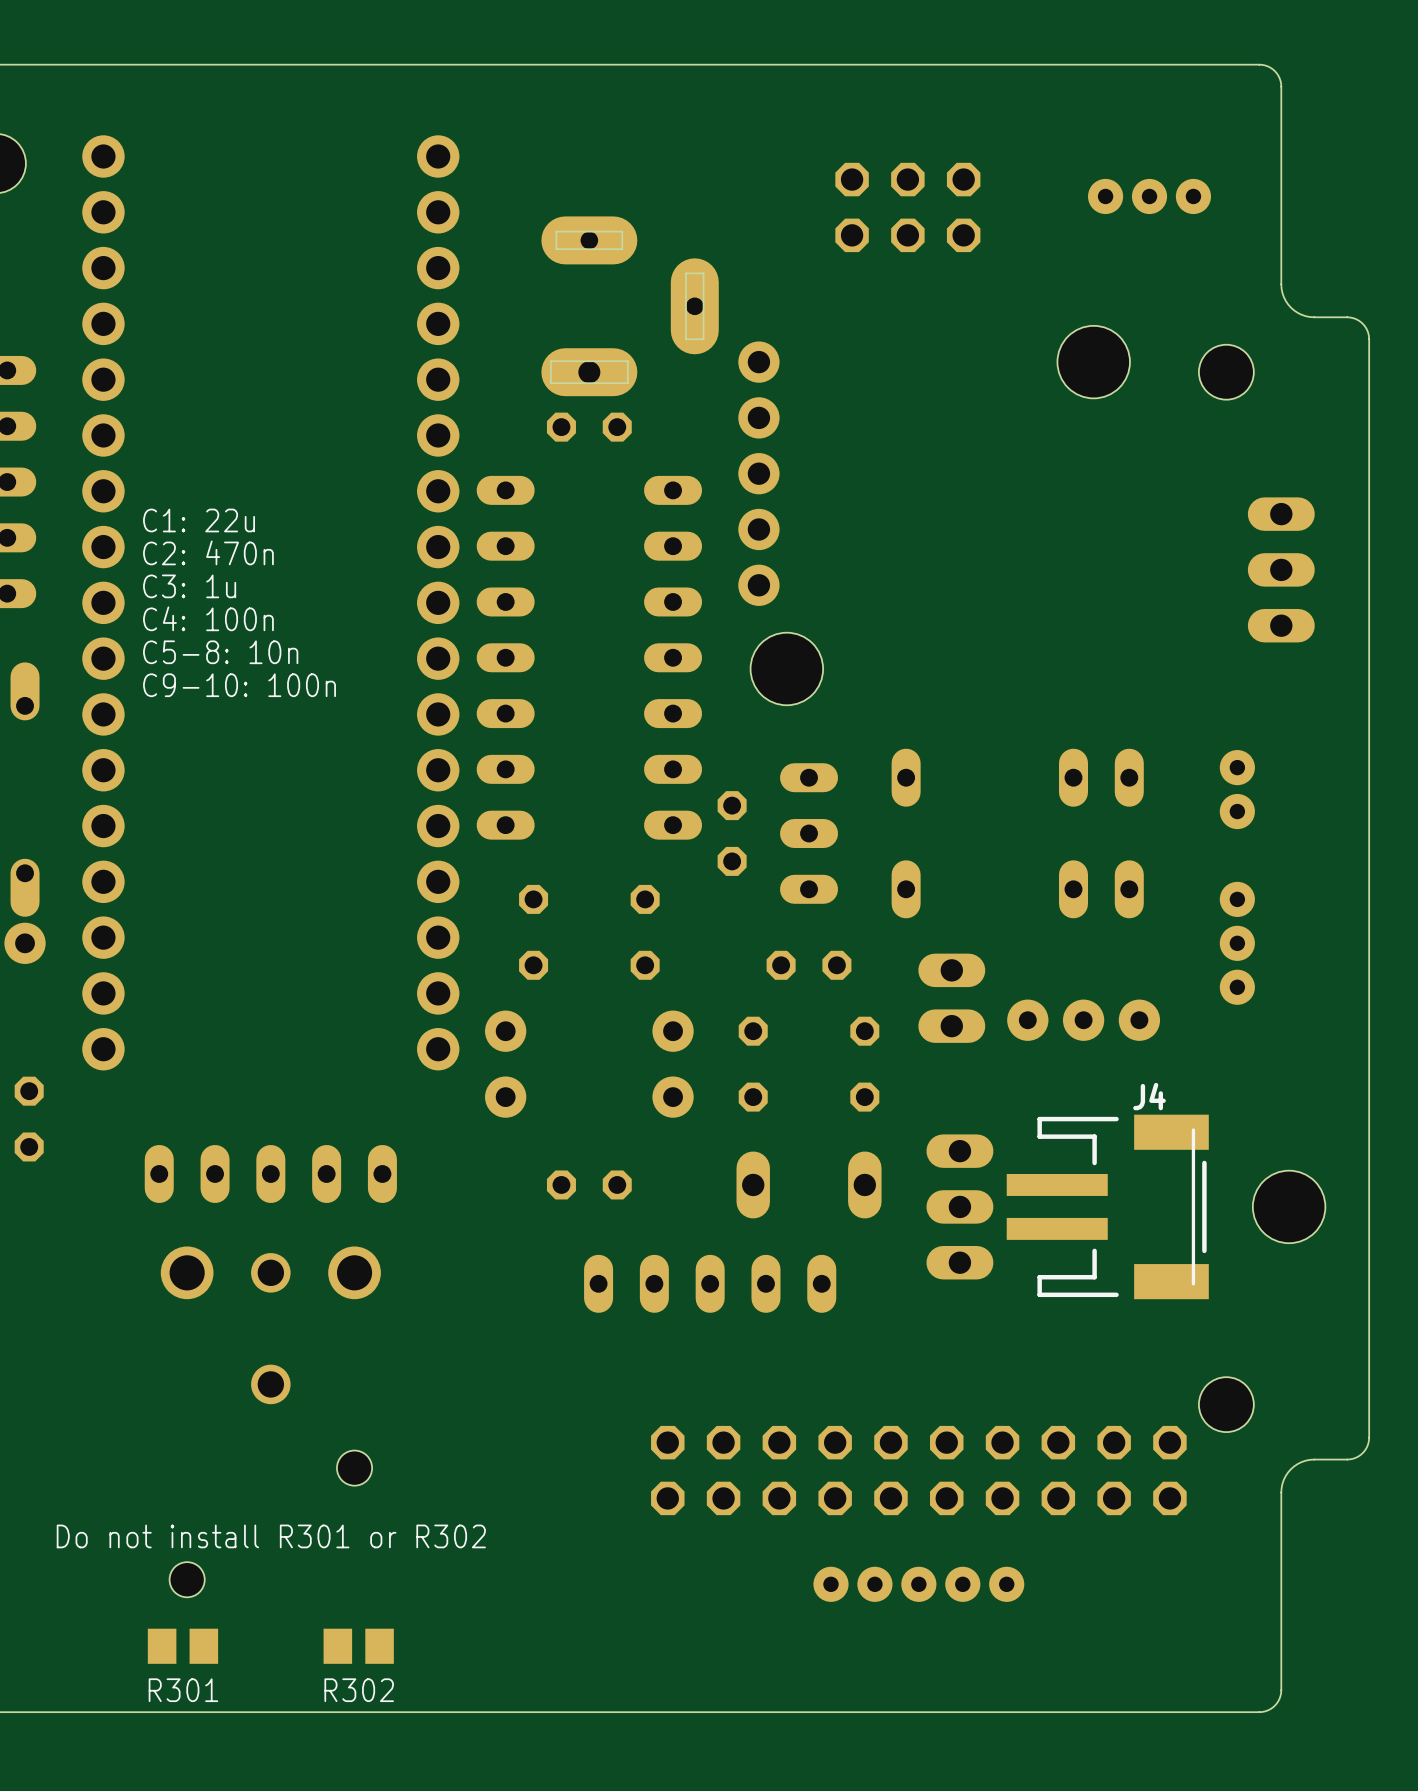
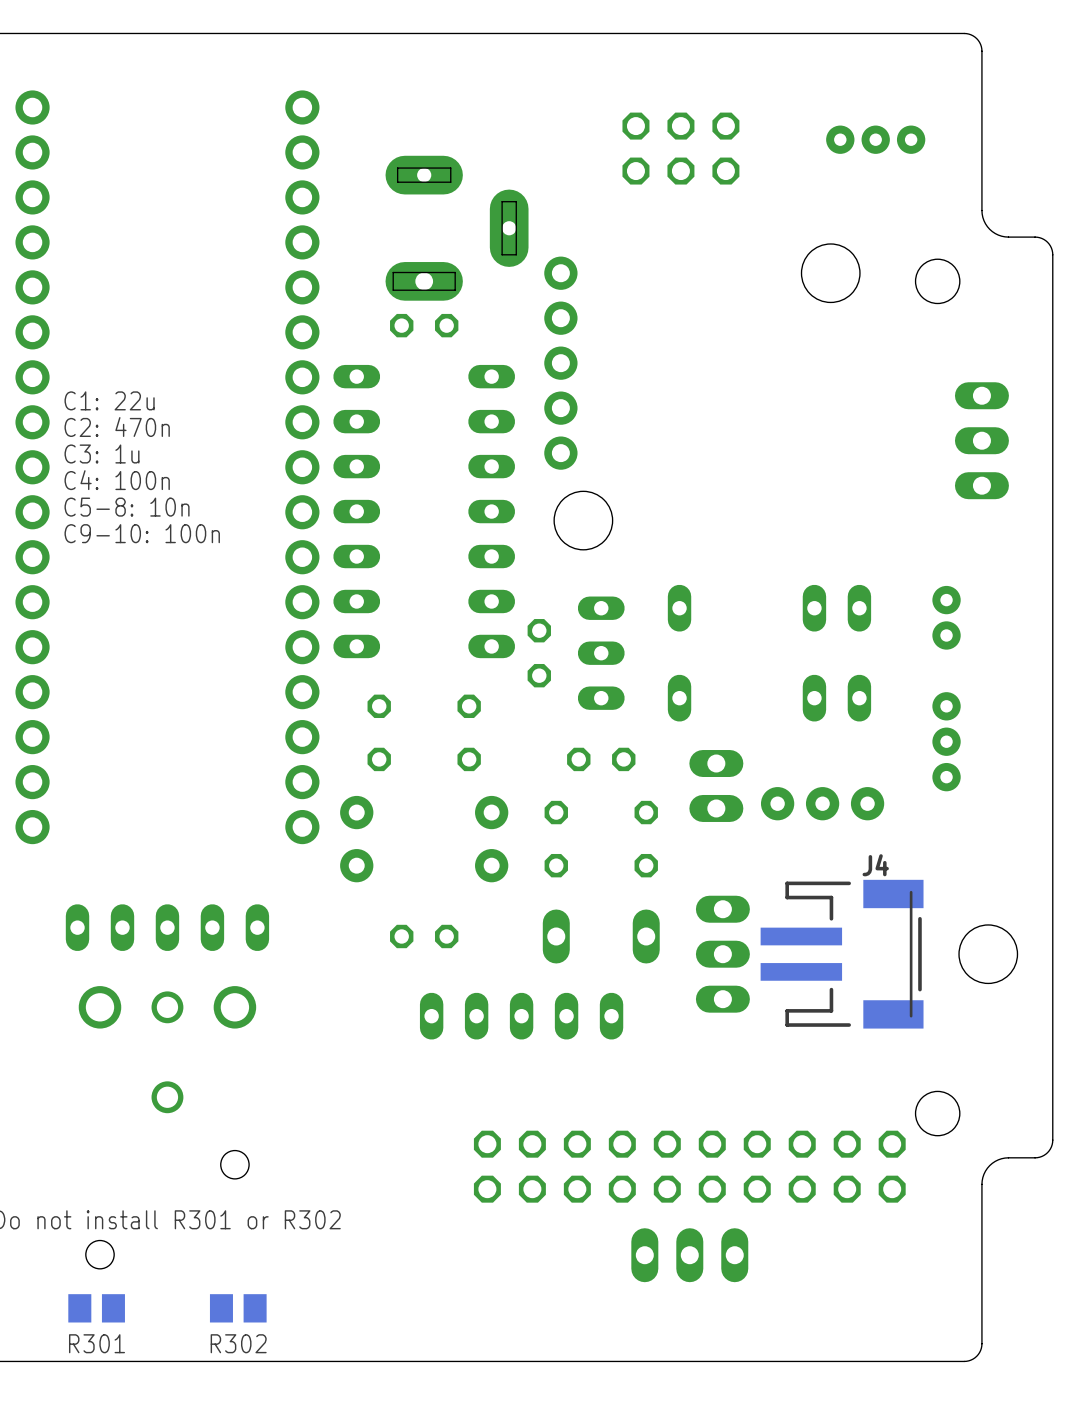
part footprint: [813, 1566, 1025, 1602] -> [631, 1228, 749, 1283]

